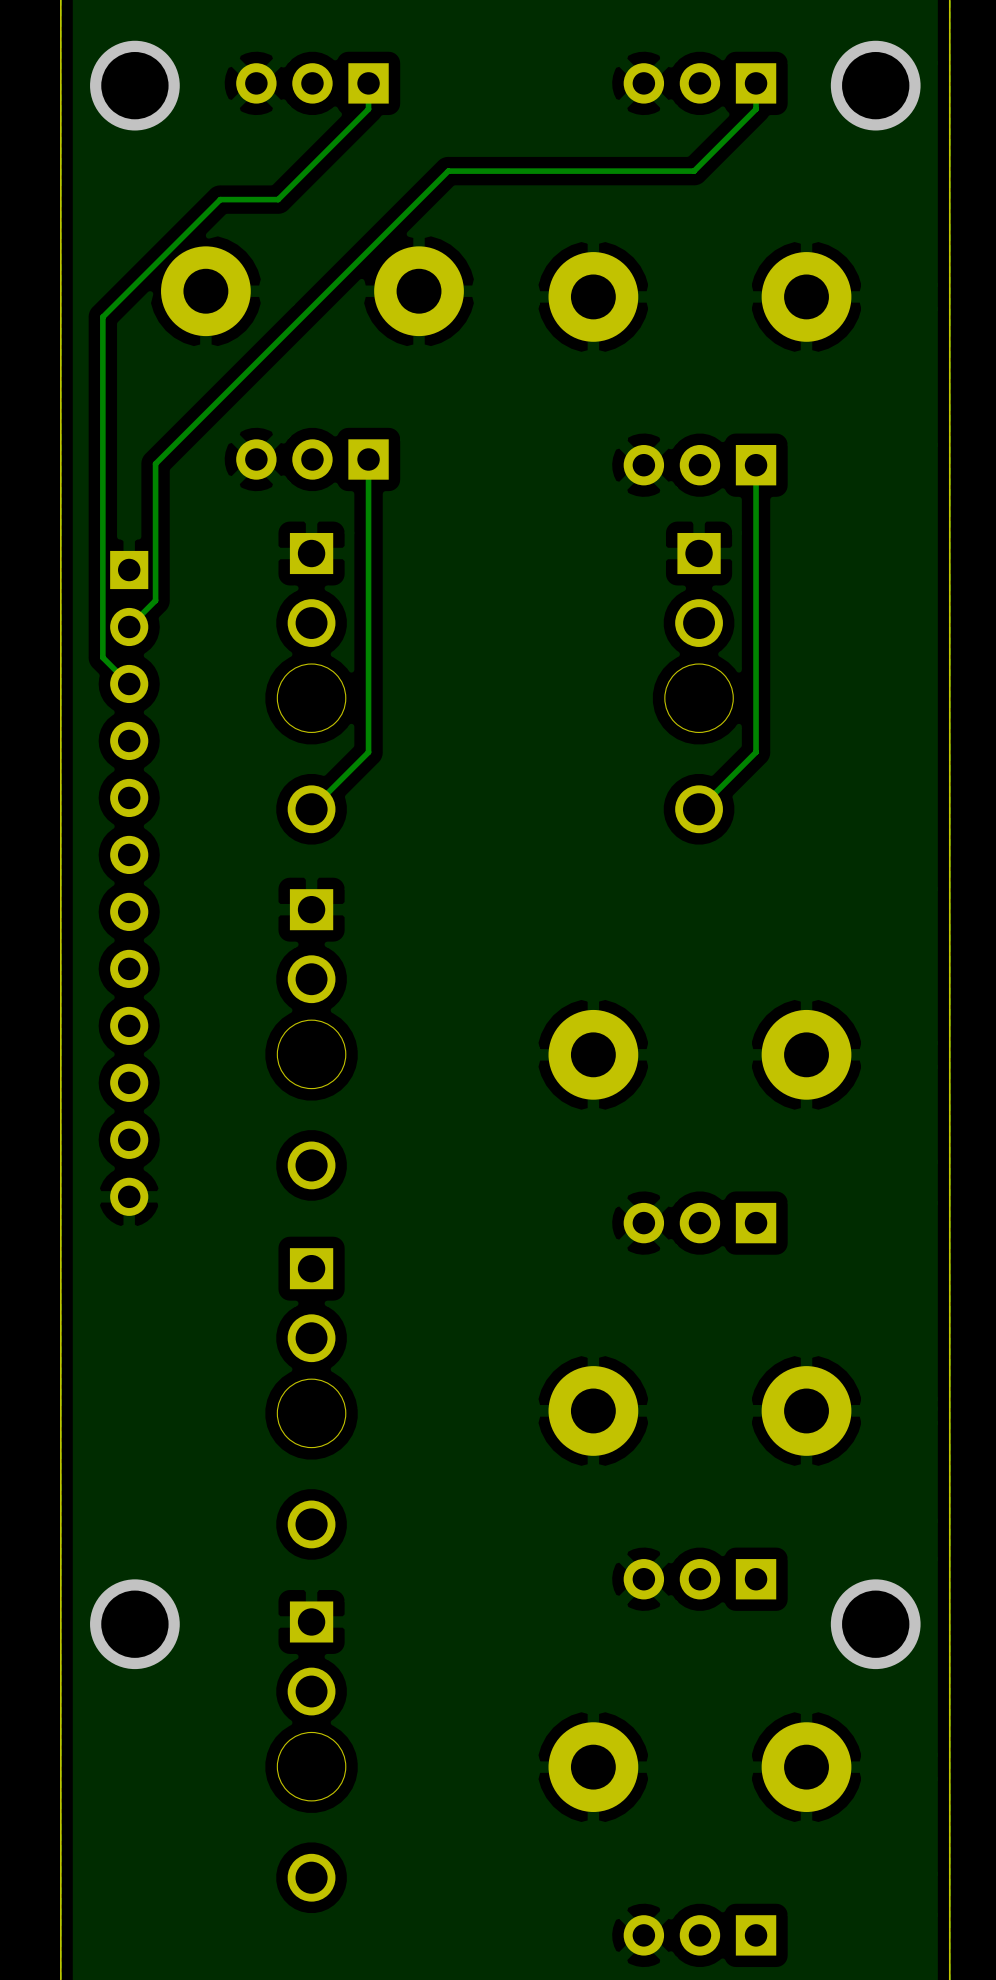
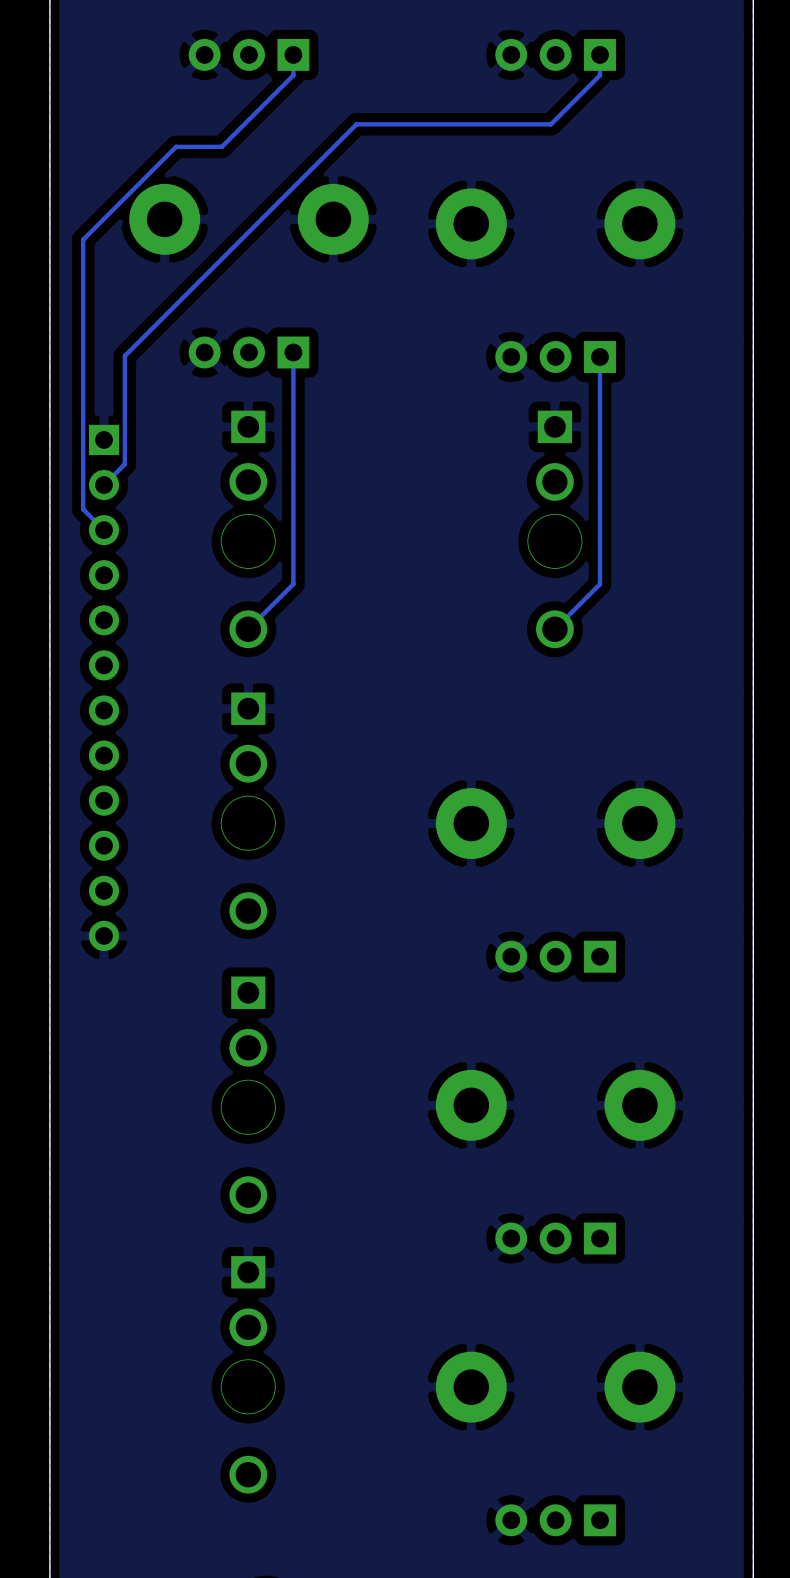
via: (134, 85) -> none
via: (875, 85) -> none
via: (134, 1624) -> none
via: (875, 1624) -> none

